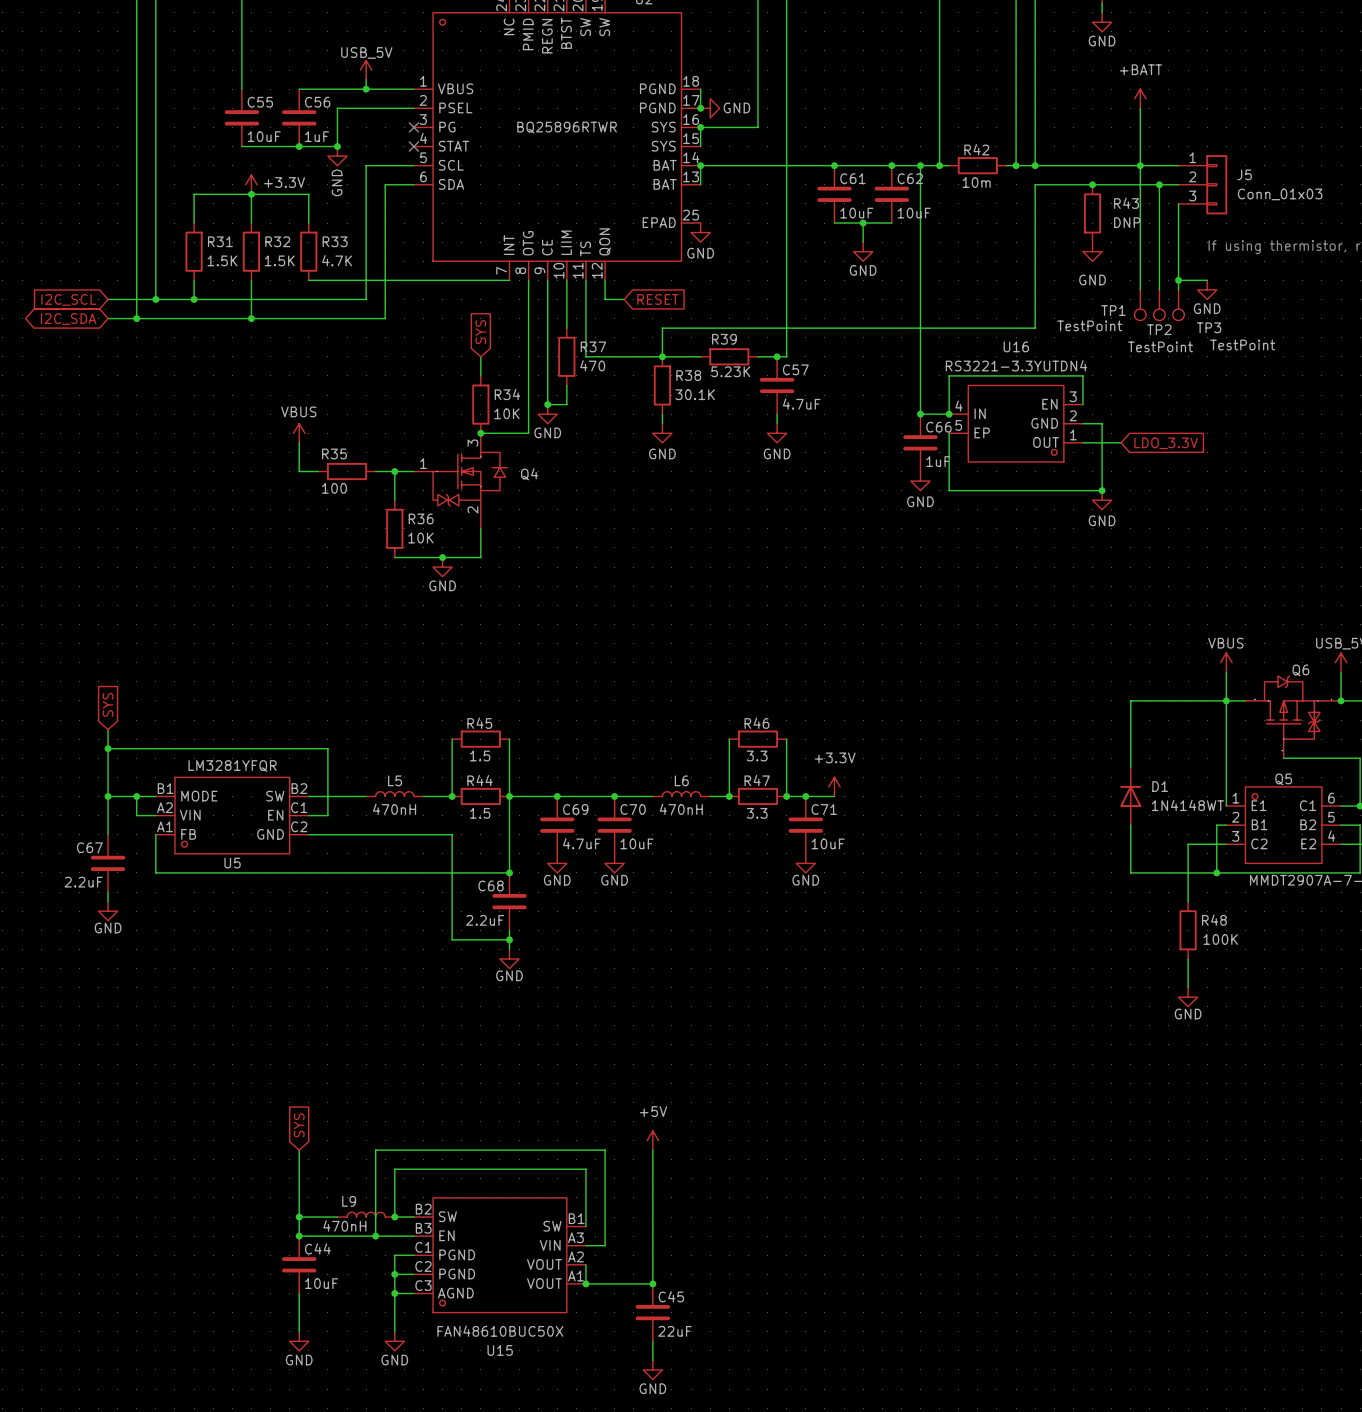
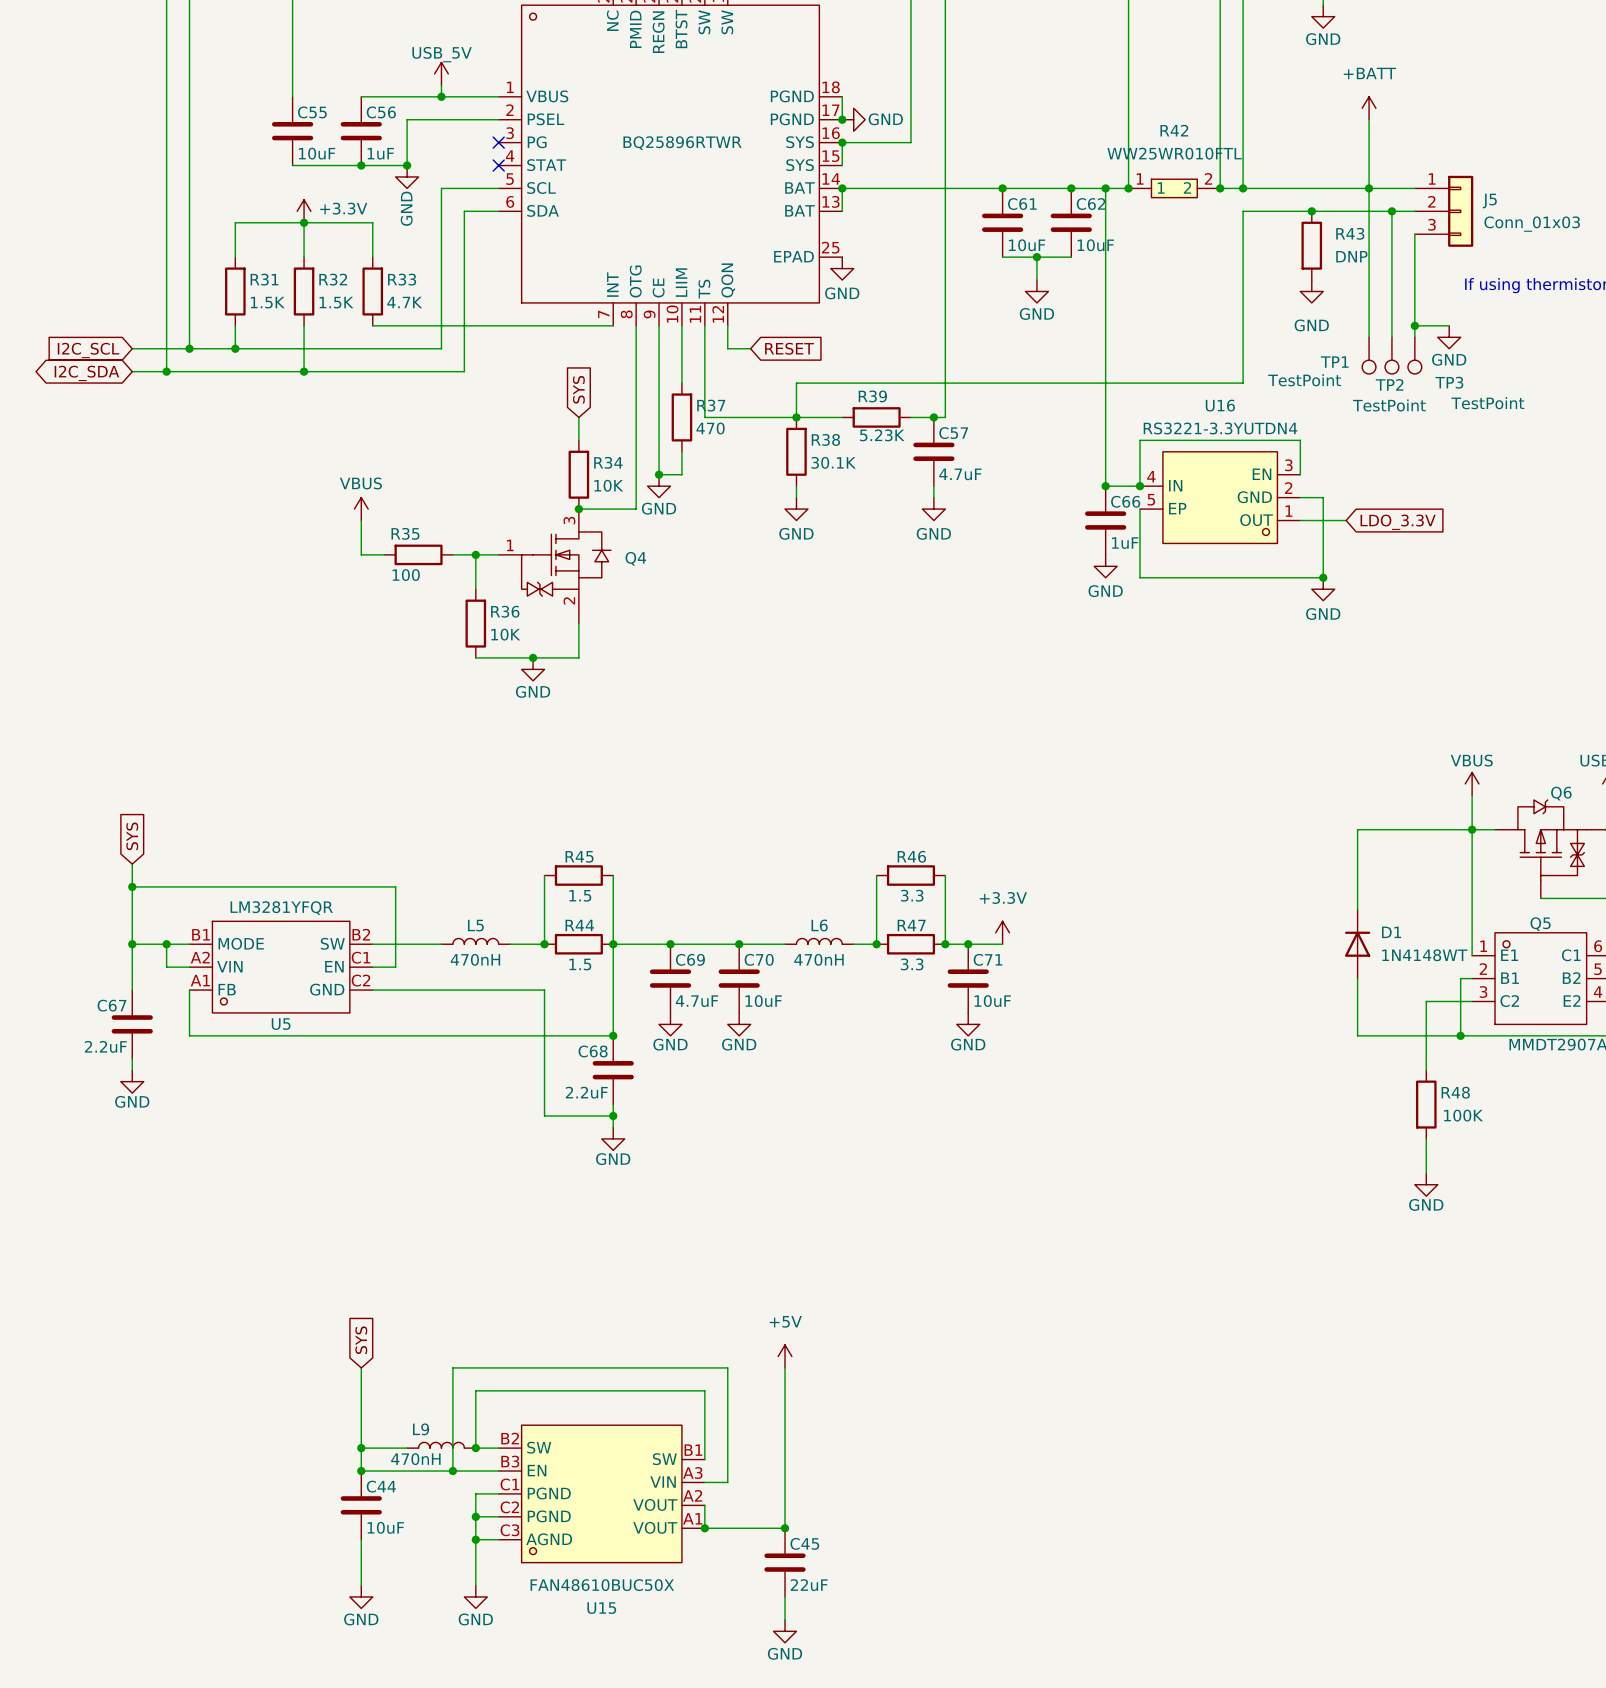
R42 name position: R42 (976, 149) -> R42 (1174, 130)
R42 symbol: [949, 157, 1007, 175] -> [1128, 179, 1221, 198]
R42 value: 10m (976, 182) -> WW25WR010FTL (1174, 153)

